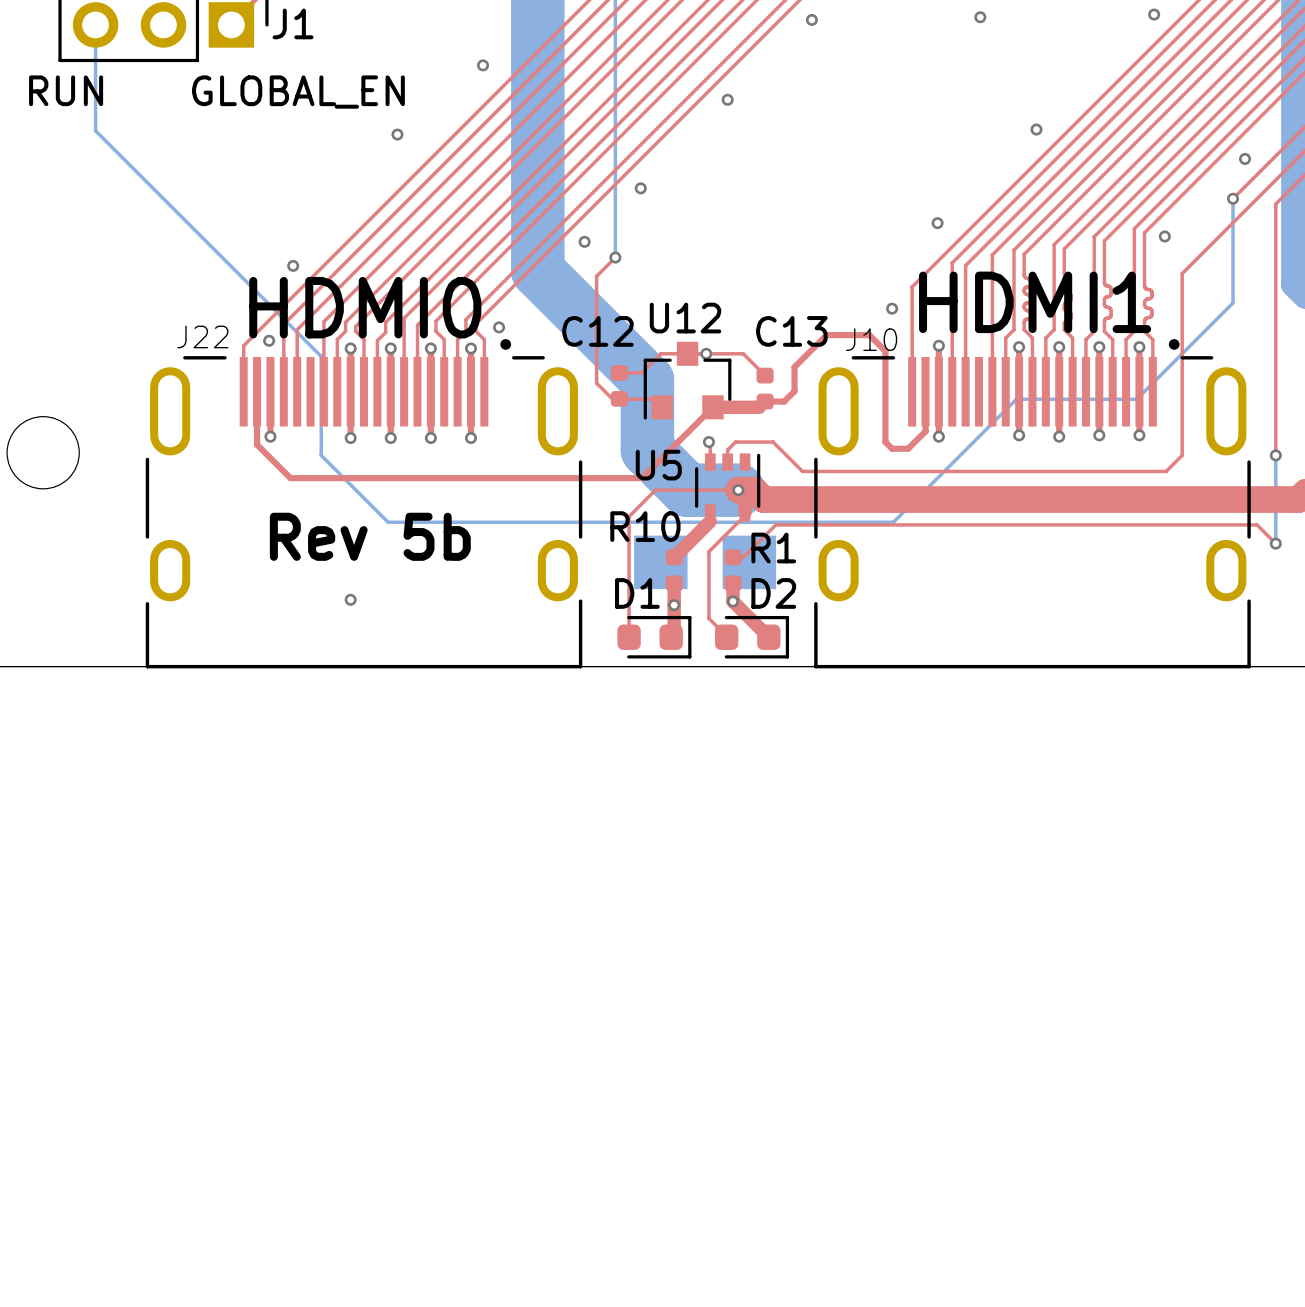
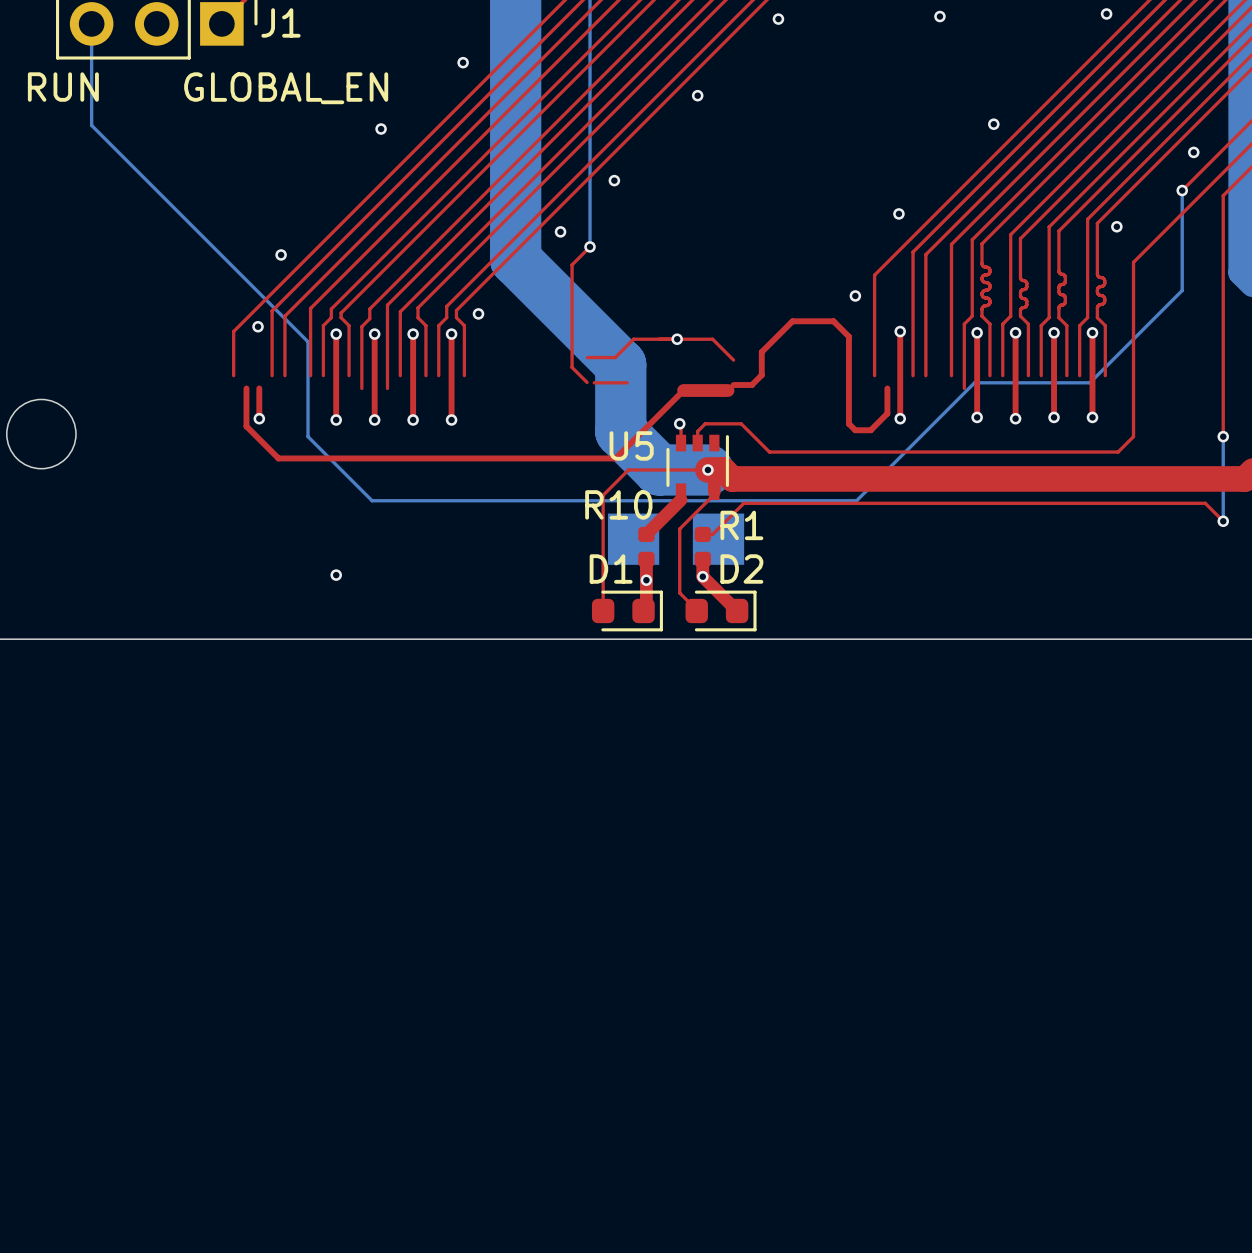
text: HDMI1 (1035, 302) -> none
text: HDMI0 (365, 307) -> none
U12: (687, 380) -> none
C12: (619, 385) -> none
C13: (765, 388) -> none
J22: (364, 503) -> none
J10: (1032, 503) -> none
text: Rev 5b (370, 536) -> none

